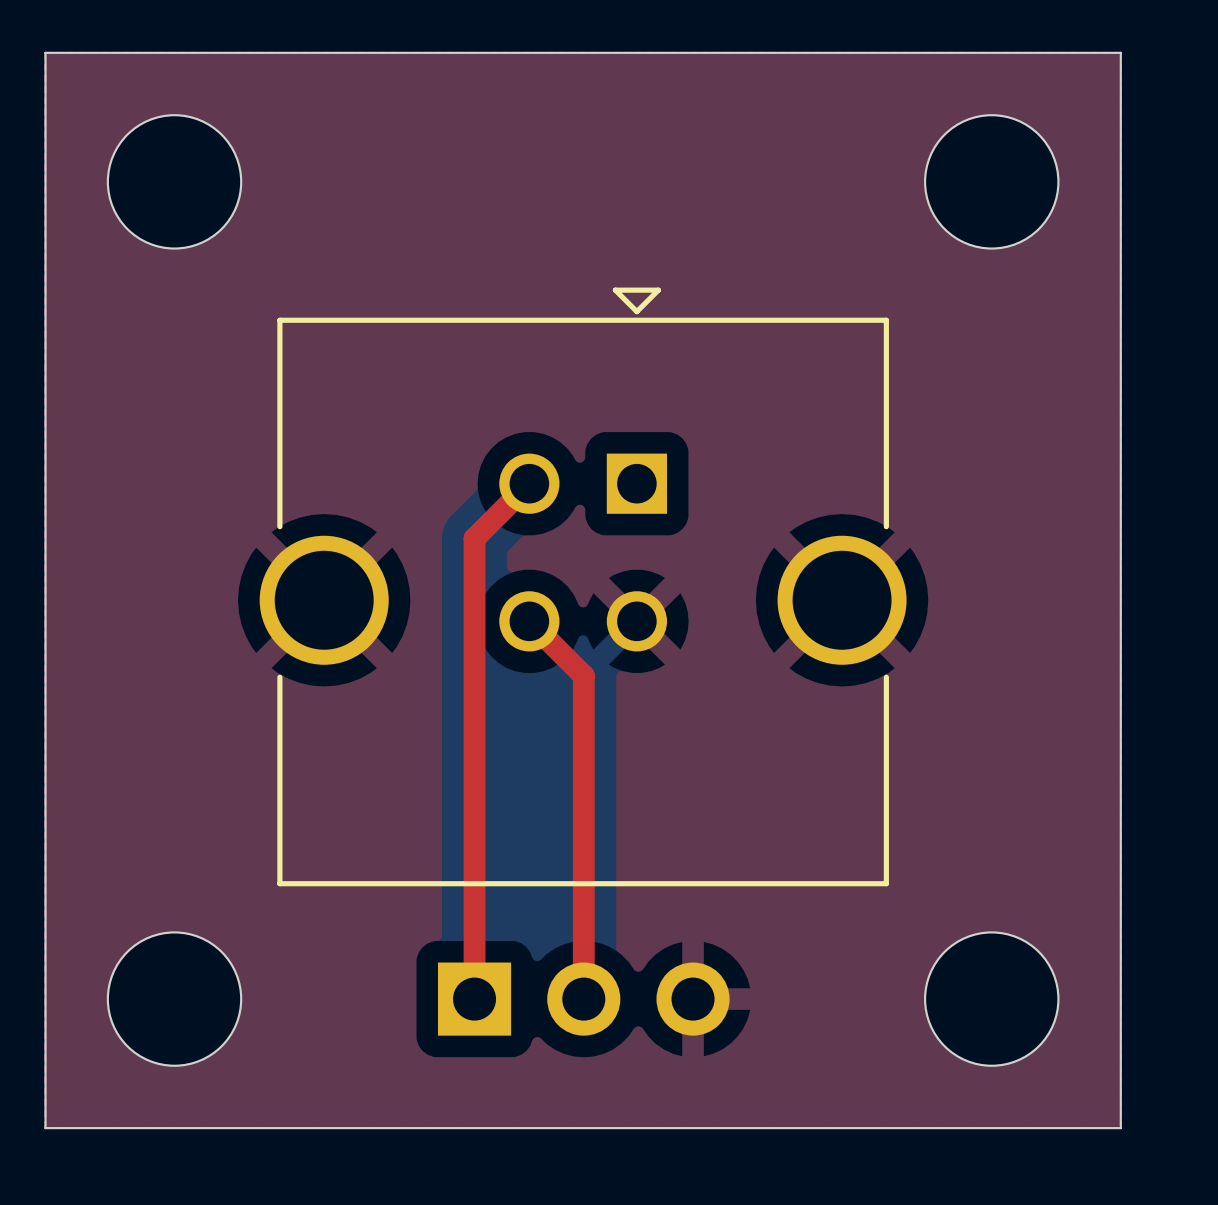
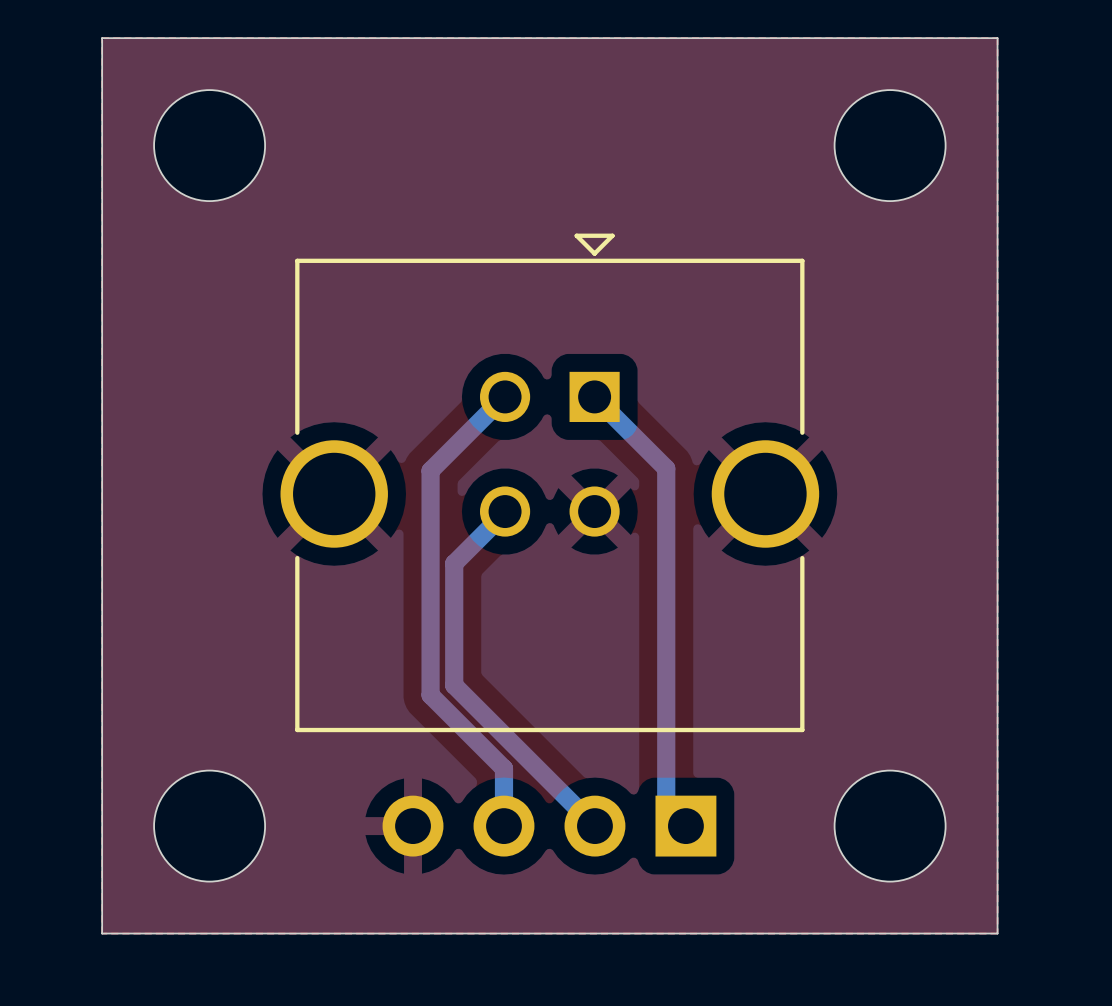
bottom track: none -> (504, 396) (430, 470) (430, 695) (503, 768) (503, 826)
top track: (529, 483) (474, 538) (474, 999) -> none
bottom track: none -> (594, 396) (666, 468) (666, 806) (685, 826)
top track: (529, 621) (583, 675) (583, 999) -> none
bottom track: none -> (505, 511) (454, 563) (454, 685) (594, 826)
part footprint: [437, 962, 730, 1036] -> [382, 795, 717, 857]

